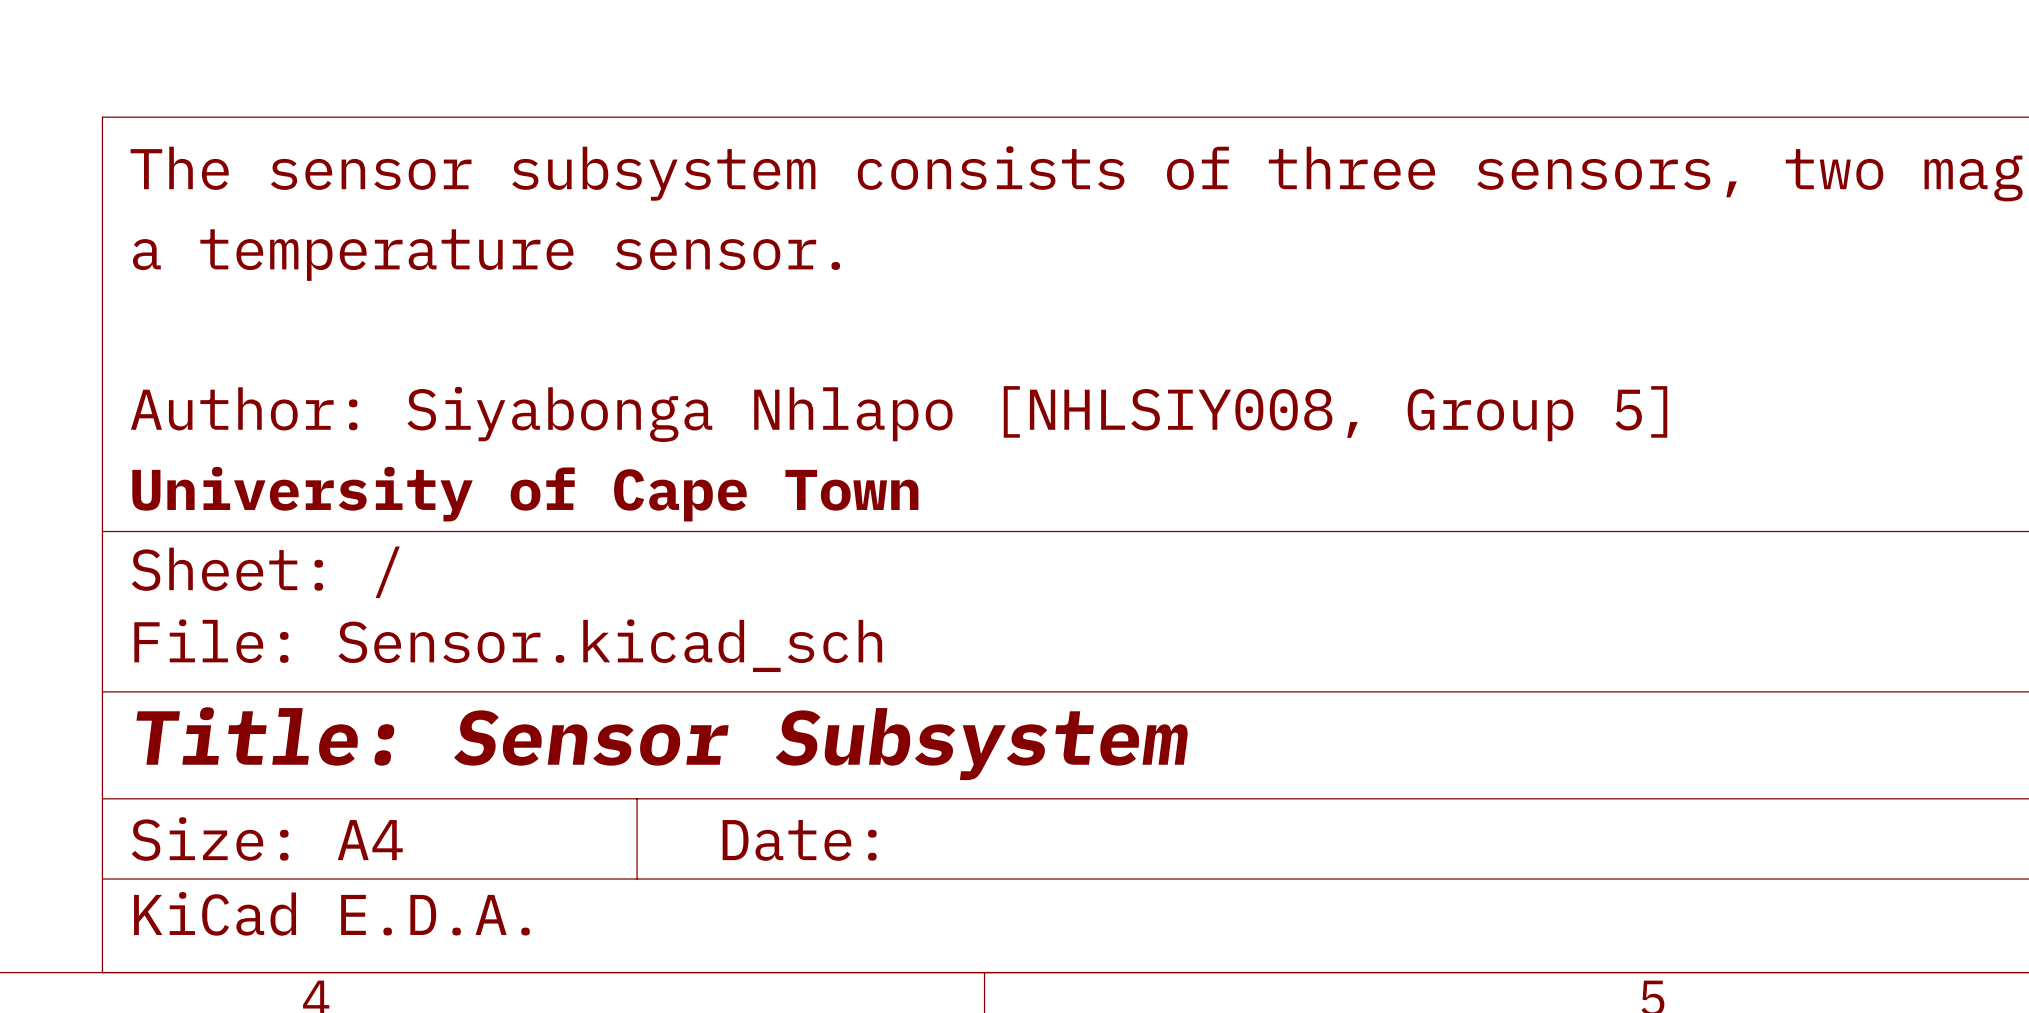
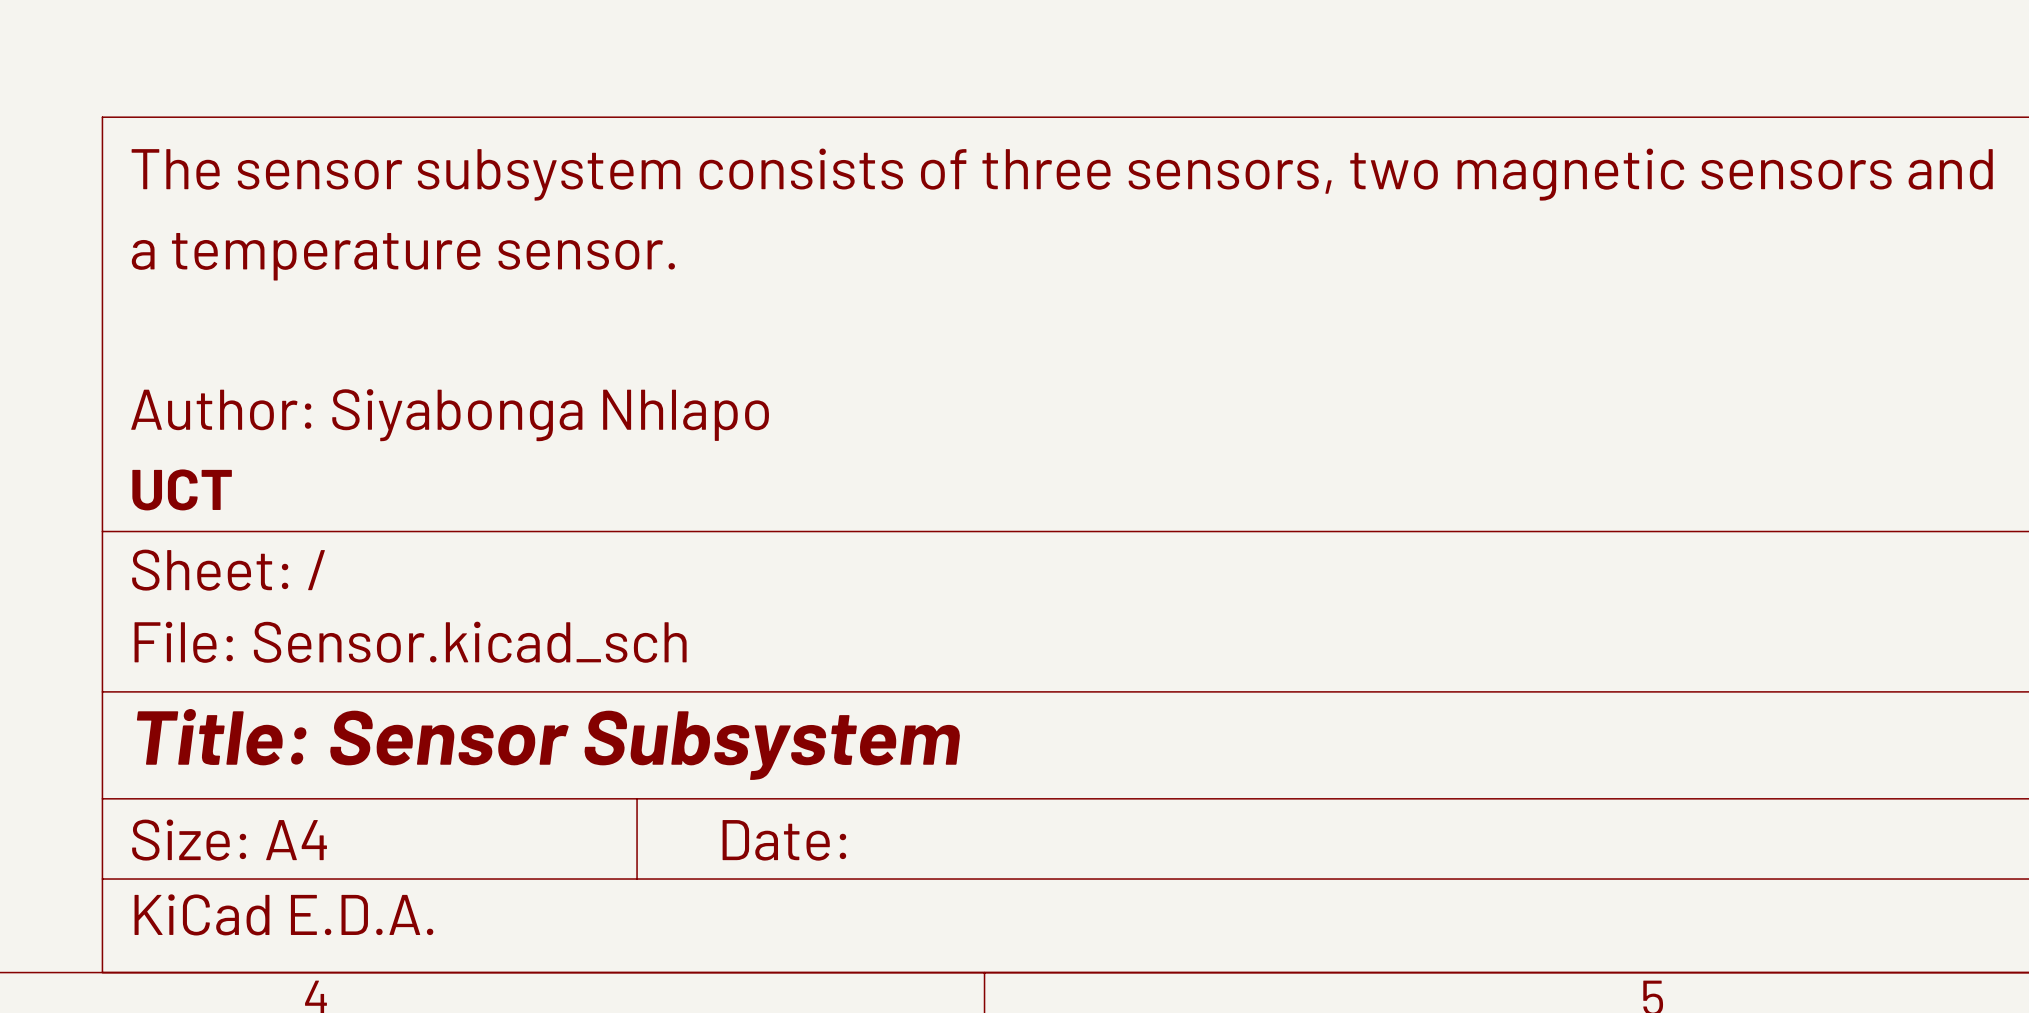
title block: Author: Siyabonga Nhlapo [NHLSIY008, Group 5] (899, 414) -> Author: Siyabonga Nhlapo (450, 415)
title block: University of Cape Town (525, 494) -> UCT (182, 489)

